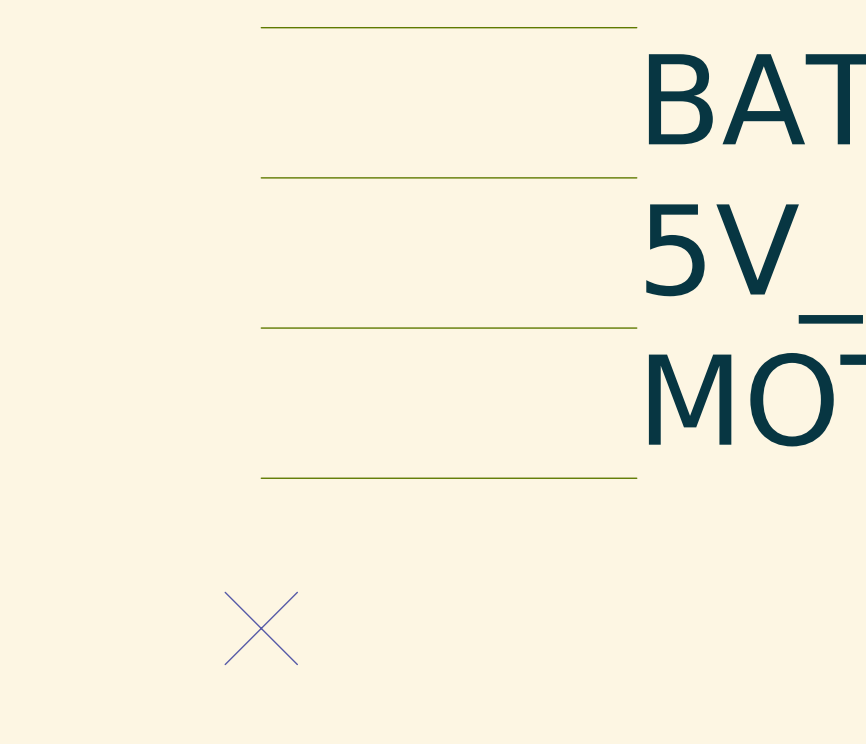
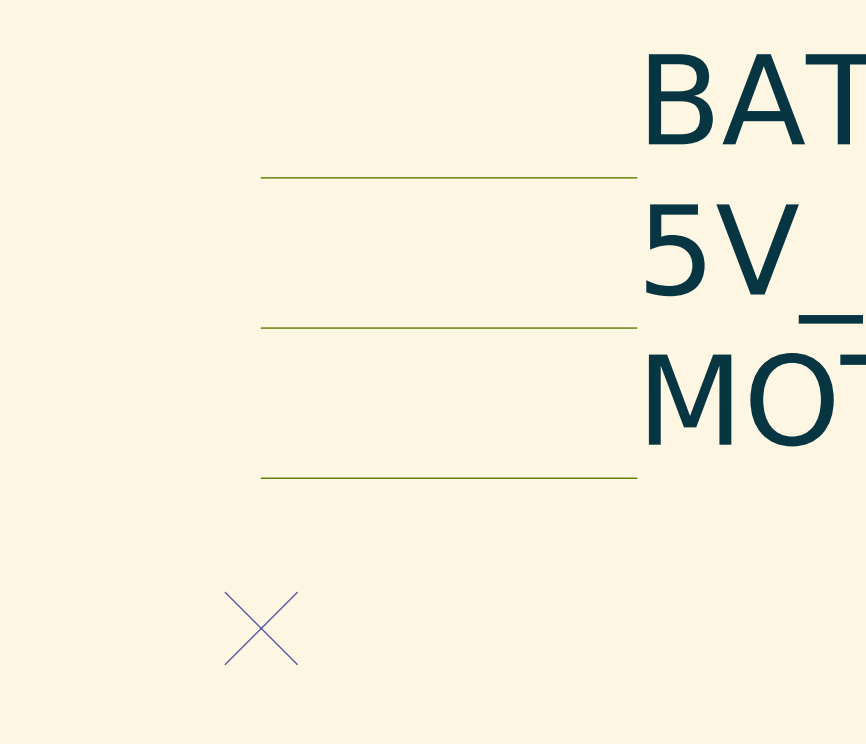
wire: (261, 27) (636, 27) -> none

